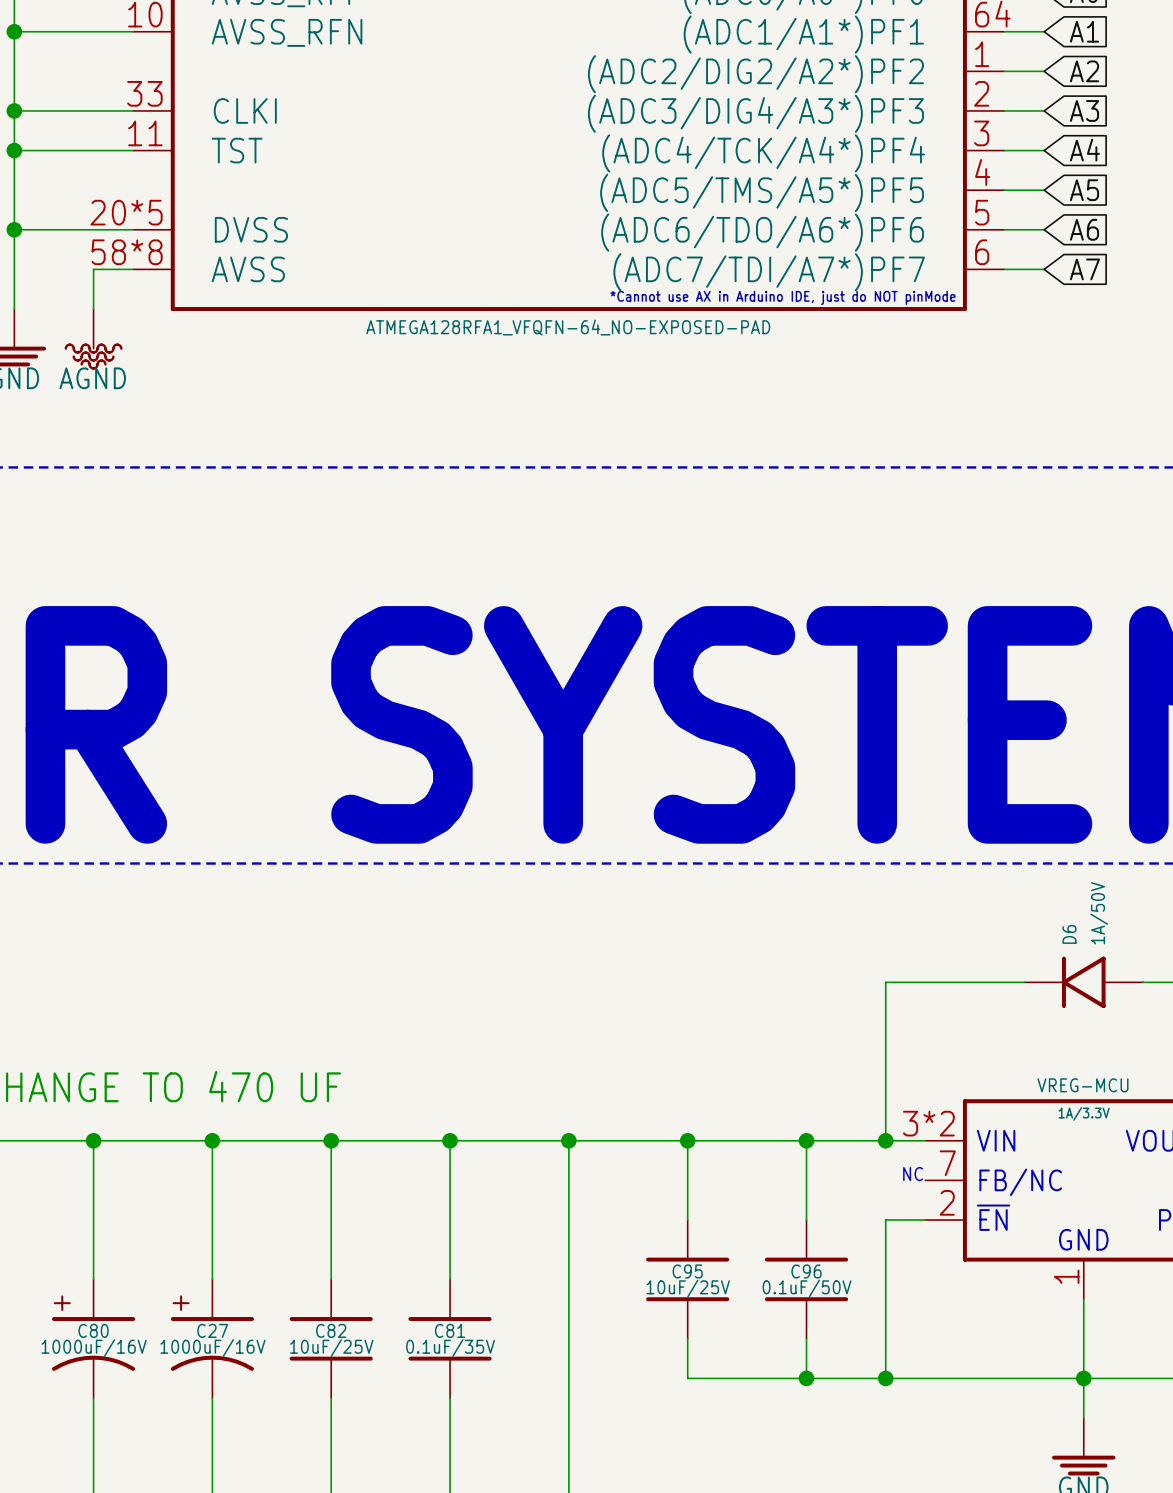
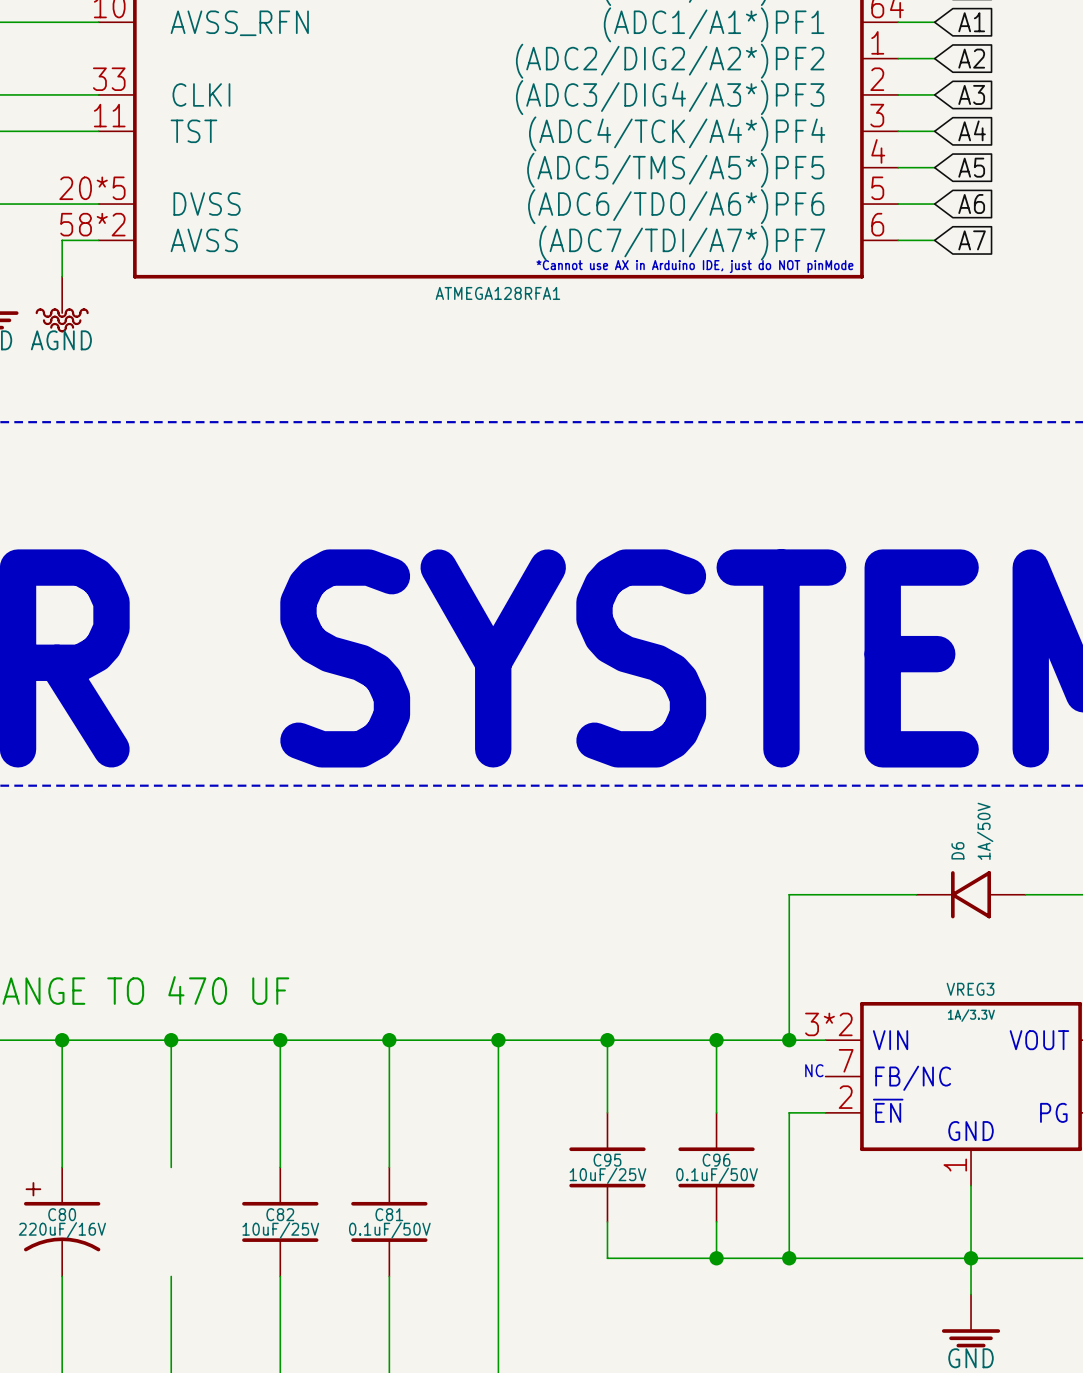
part pin number: 58*8 (127, 252) -> 58*2 (92, 224)
part value: ATMEGA128RFA1_VFQFN-64_NO-EXPOSED-PAD (568, 327) -> ATMEGA128RFA1 (497, 293)
VREG-MCU name: VREG-MCU (1082, 1085) -> VREG3 (970, 989)
C27: 1000uF/16V (212, 1338) -> none
C80 value: 1000uF/16V (94, 1347) -> 220uF/16V (62, 1230)
C81 value: 0.1uF/35V (450, 1347) -> 0.1uF/50V (389, 1230)

